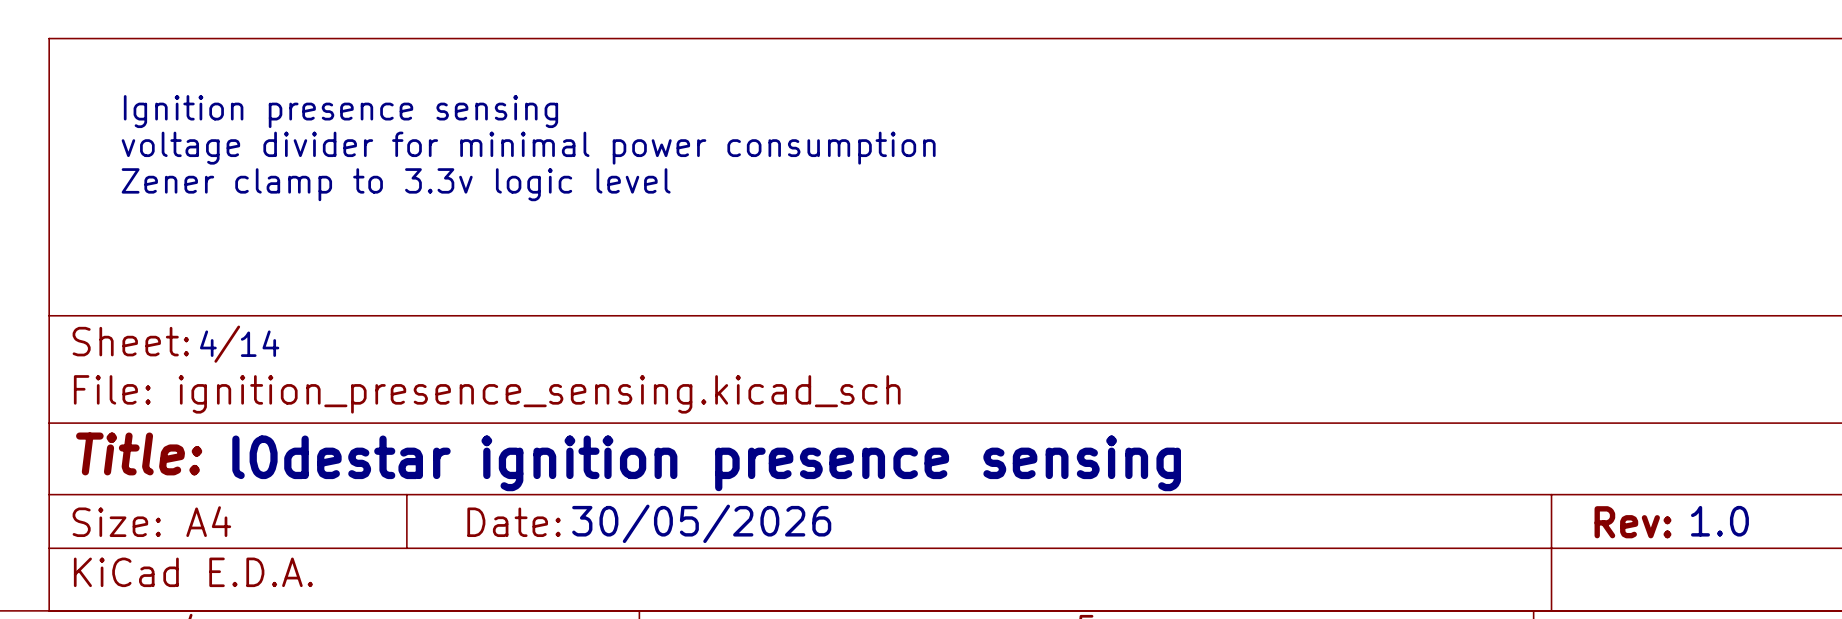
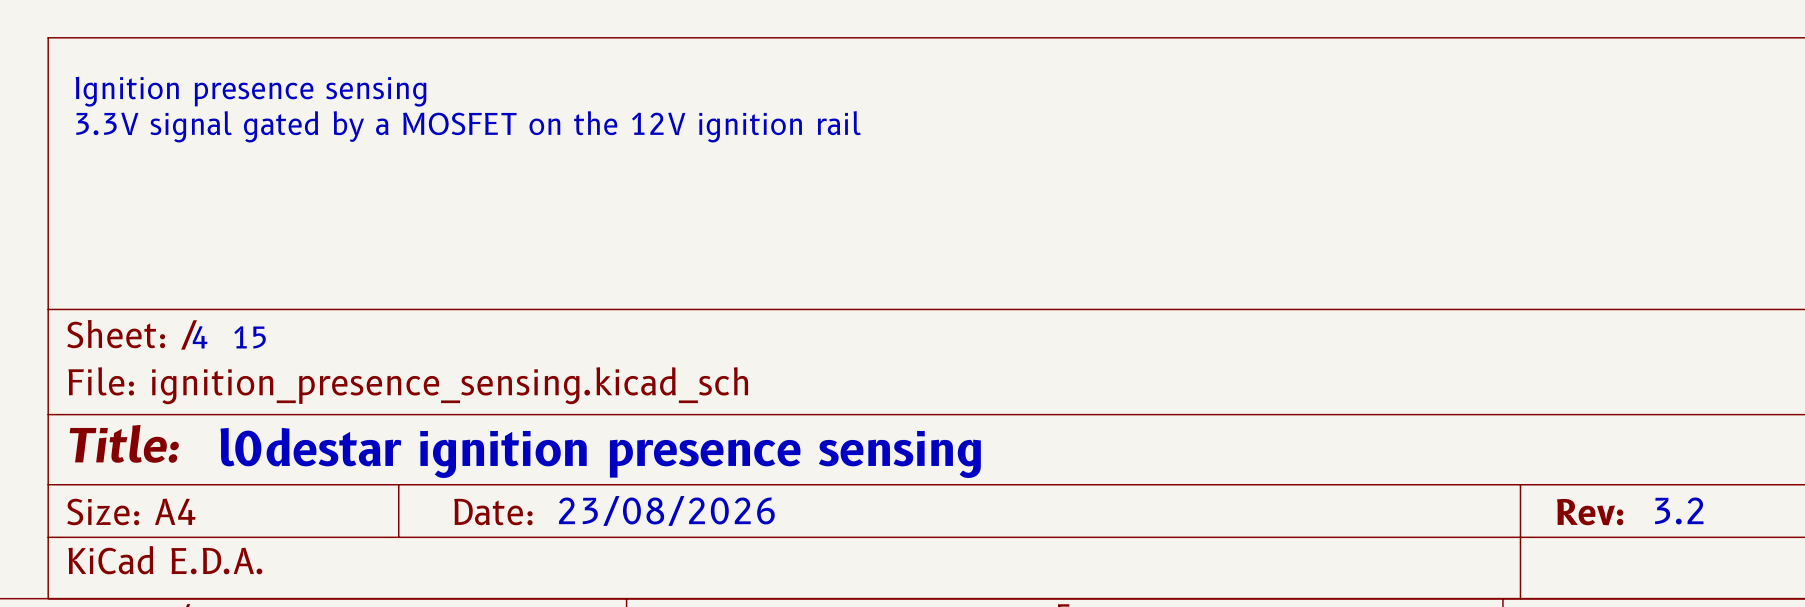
text position: Ignition presence sensing (340, 111) -> Ignition presence sensing (250, 91)
text: none -> 3.3V signal gated by a MOSFET on the 12V ignition rail (468, 126)
text: voltage divider for minimal power consumption (528, 148) -> none
text: Zener clamp to 3.3v logic level (396, 184) -> none
text: 14 (260, 343) -> 15 (250, 337)
text: 1.0 (1719, 521) -> 3.2 (1679, 510)
text: 30/05/2026 (701, 523) -> 23/08/2026 (666, 510)

